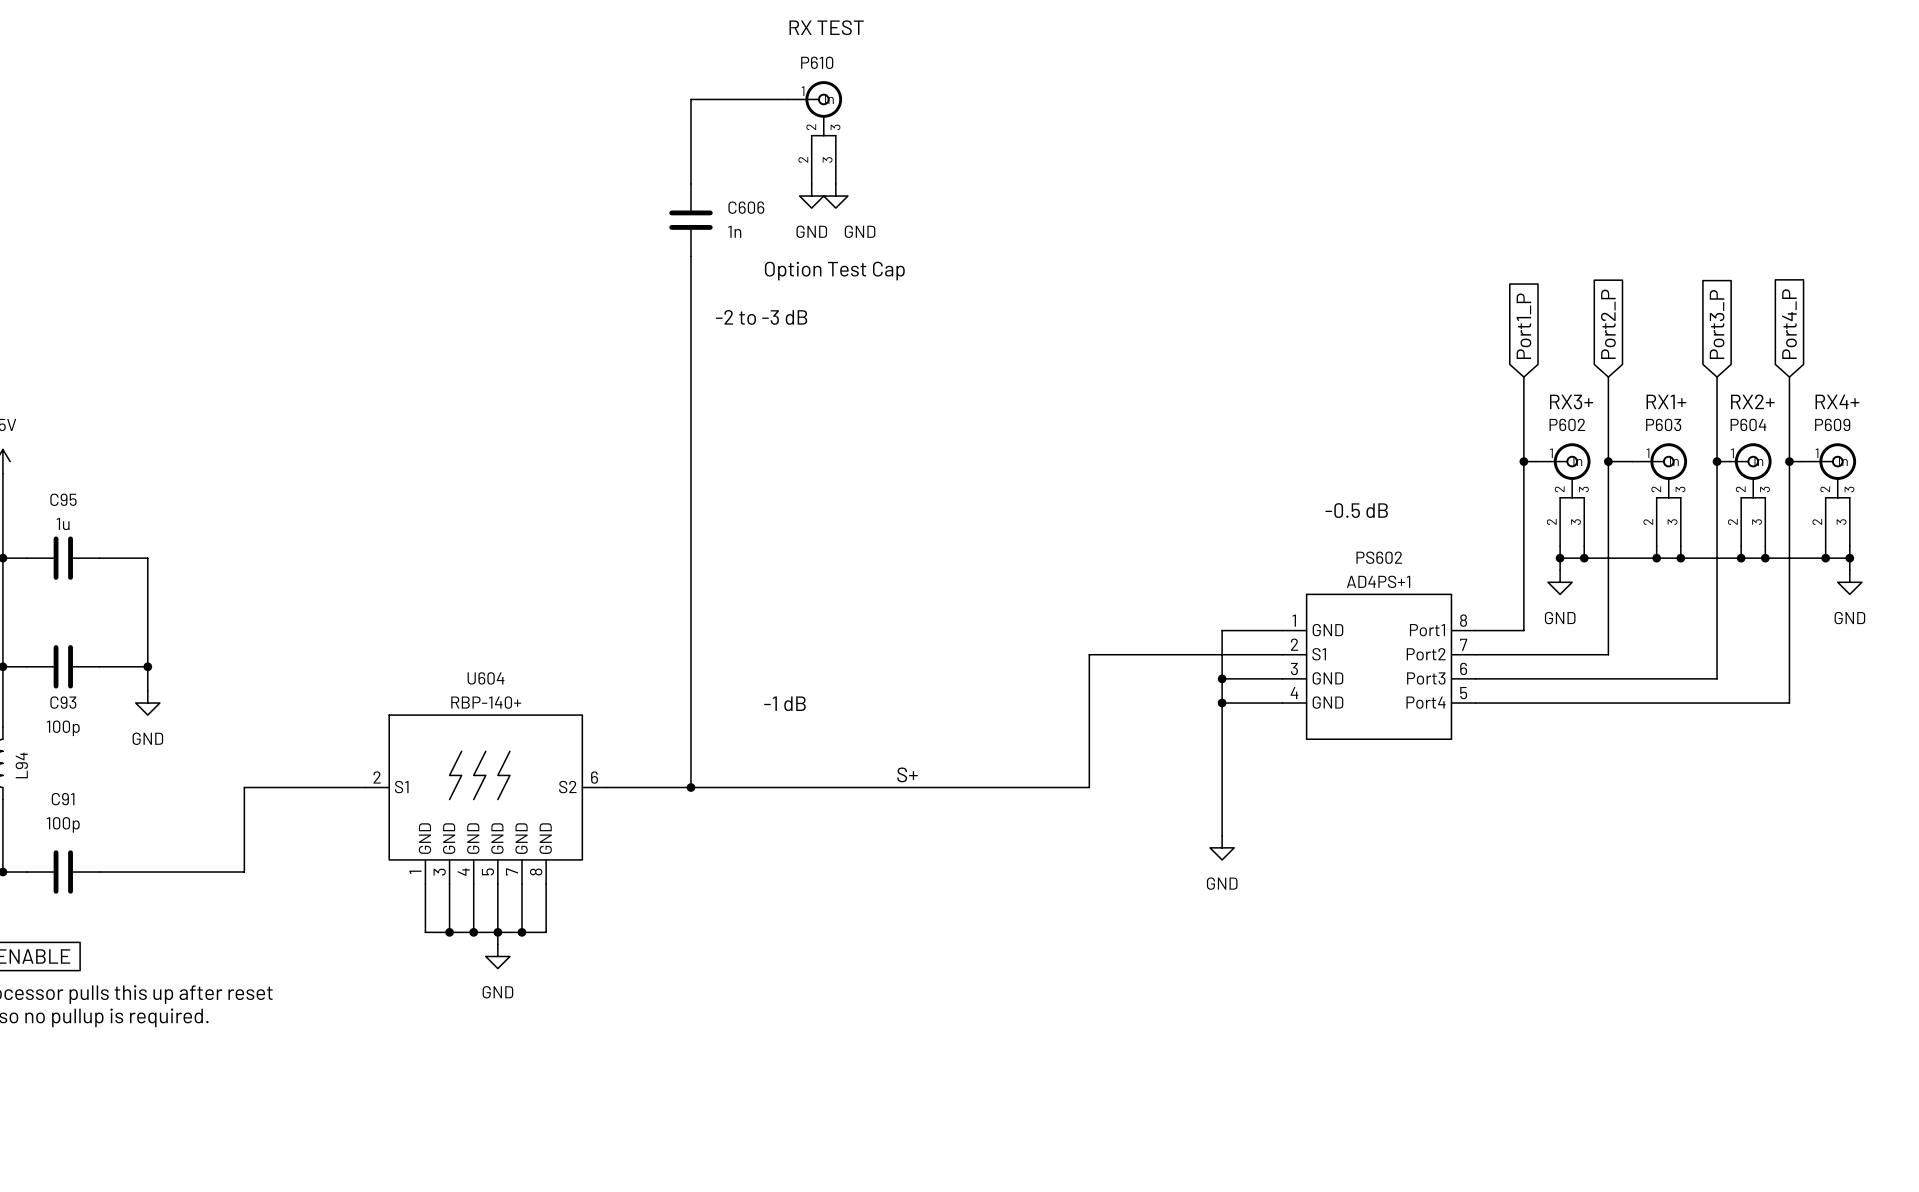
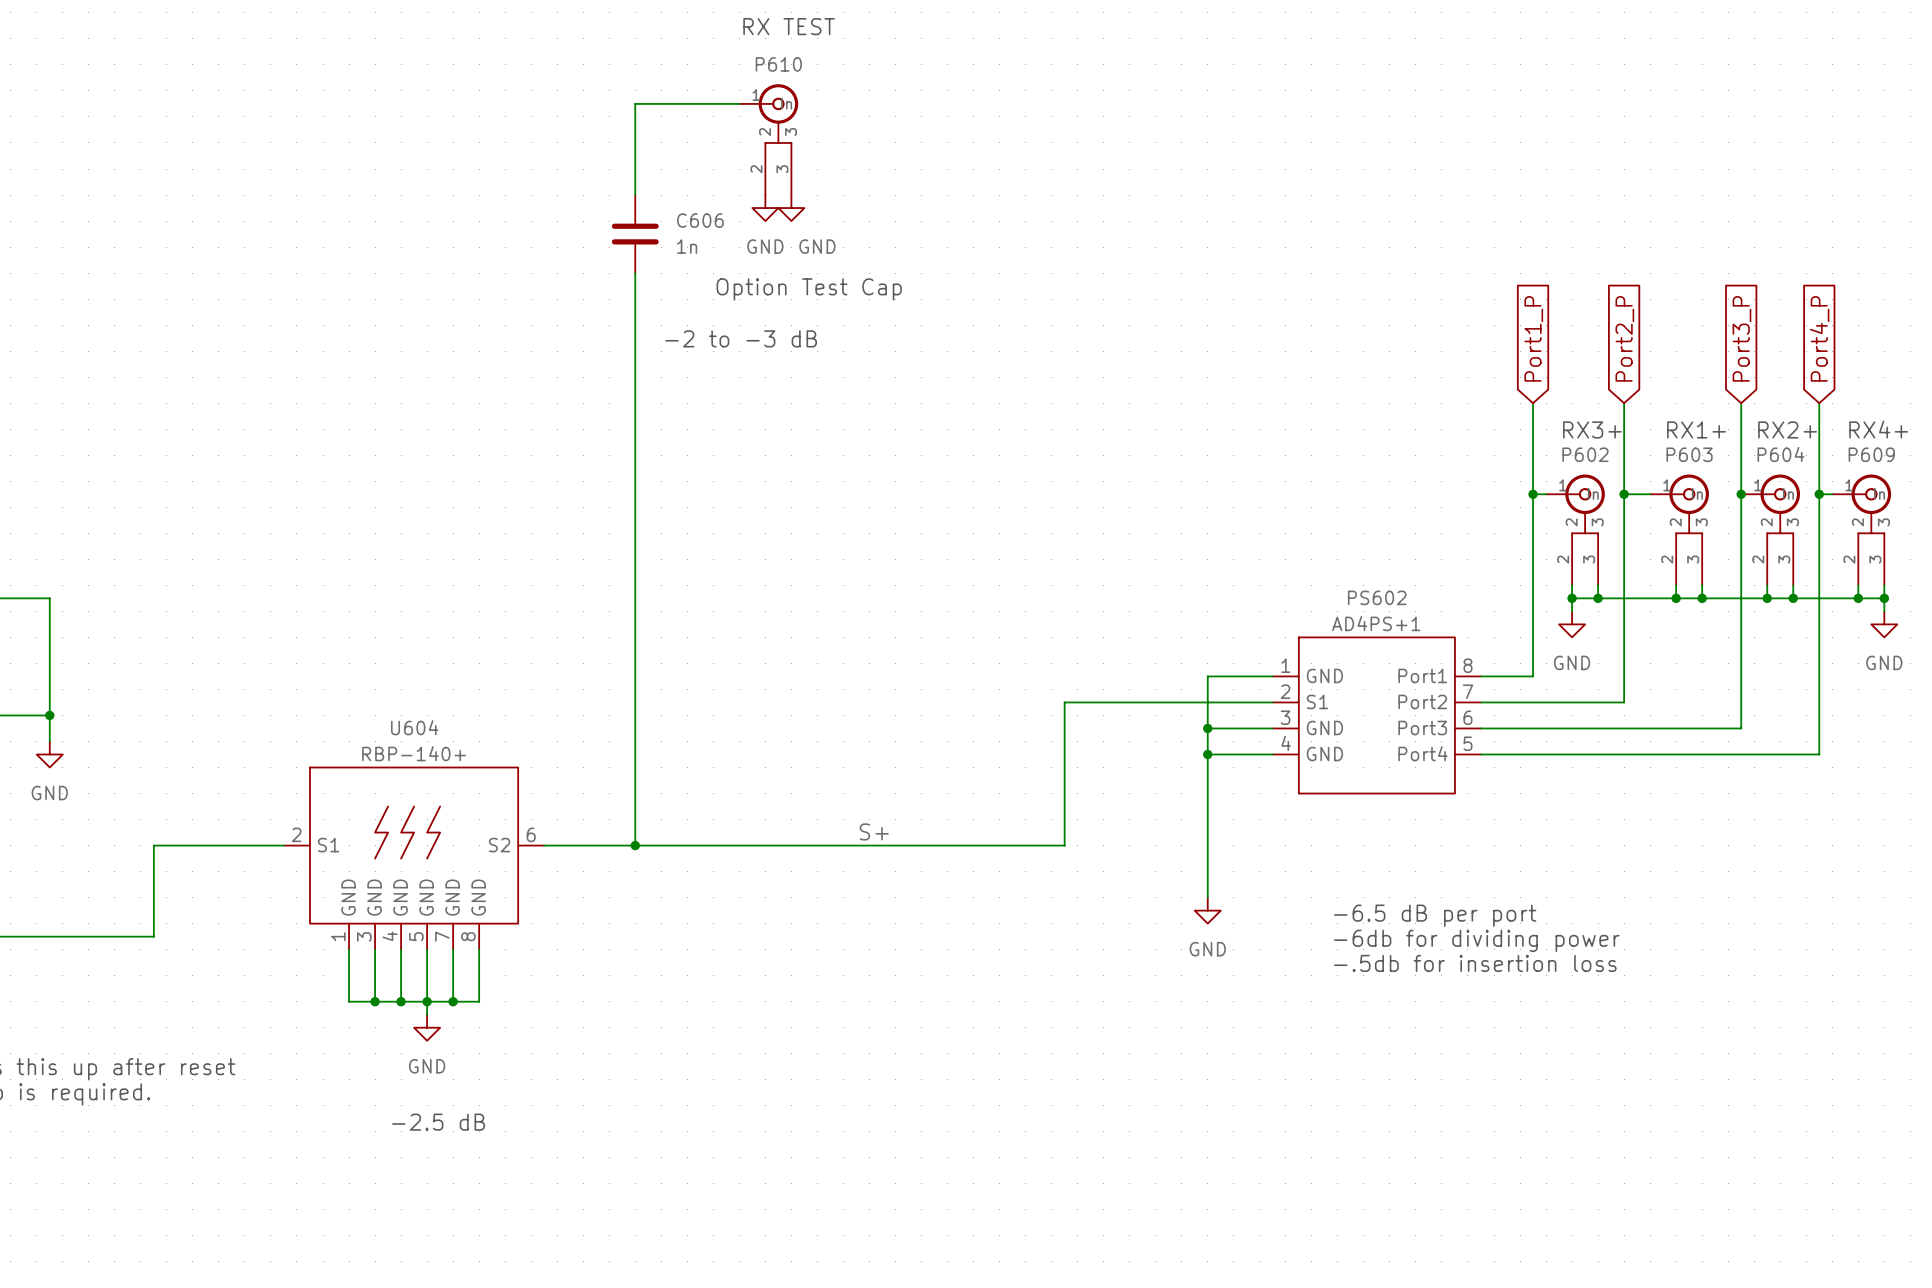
text: -0.5 dB (1356, 510) -> none
text: -1 dB (784, 703) -> none
text: none -> -6.5 dB per port (1435, 915)
text: none -> -6db for dividing power (1476, 940)
text: none -> -.5db for insertion loss (1475, 963)
text: none -> -2.5 dB (438, 1122)

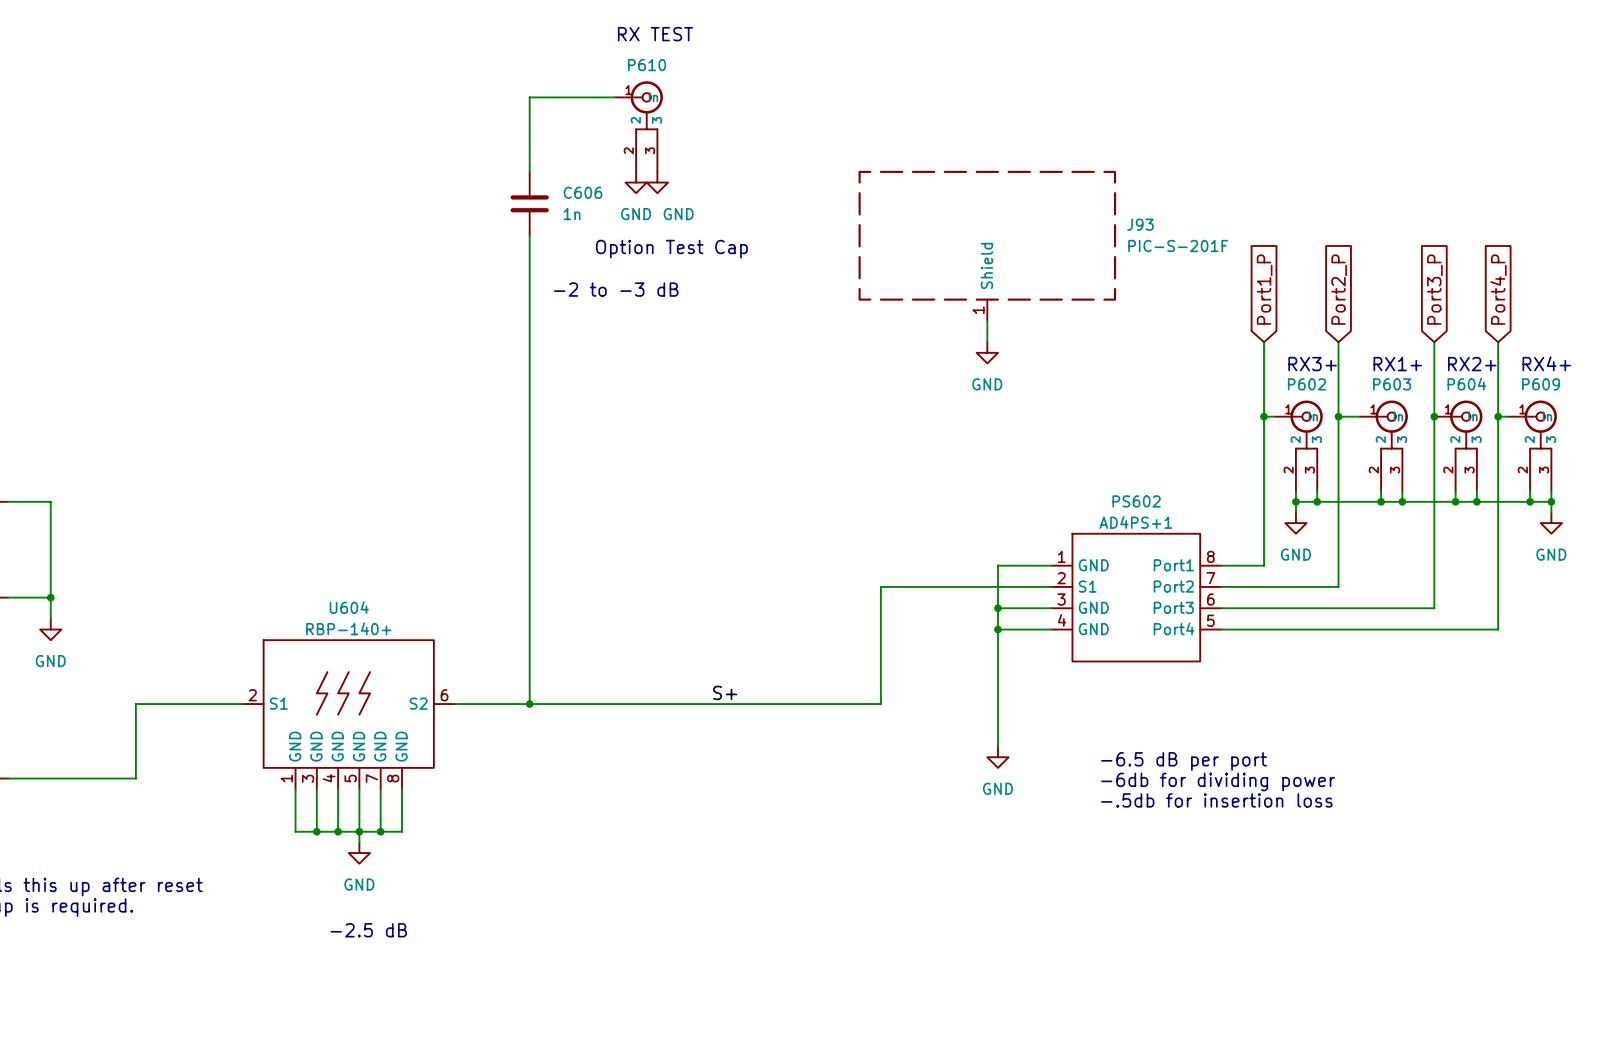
J93: none -> PIC-S-201F (987, 245)
wire: none -> (987, 320) (987, 342)
power symbol: none -> GND (987, 352)

